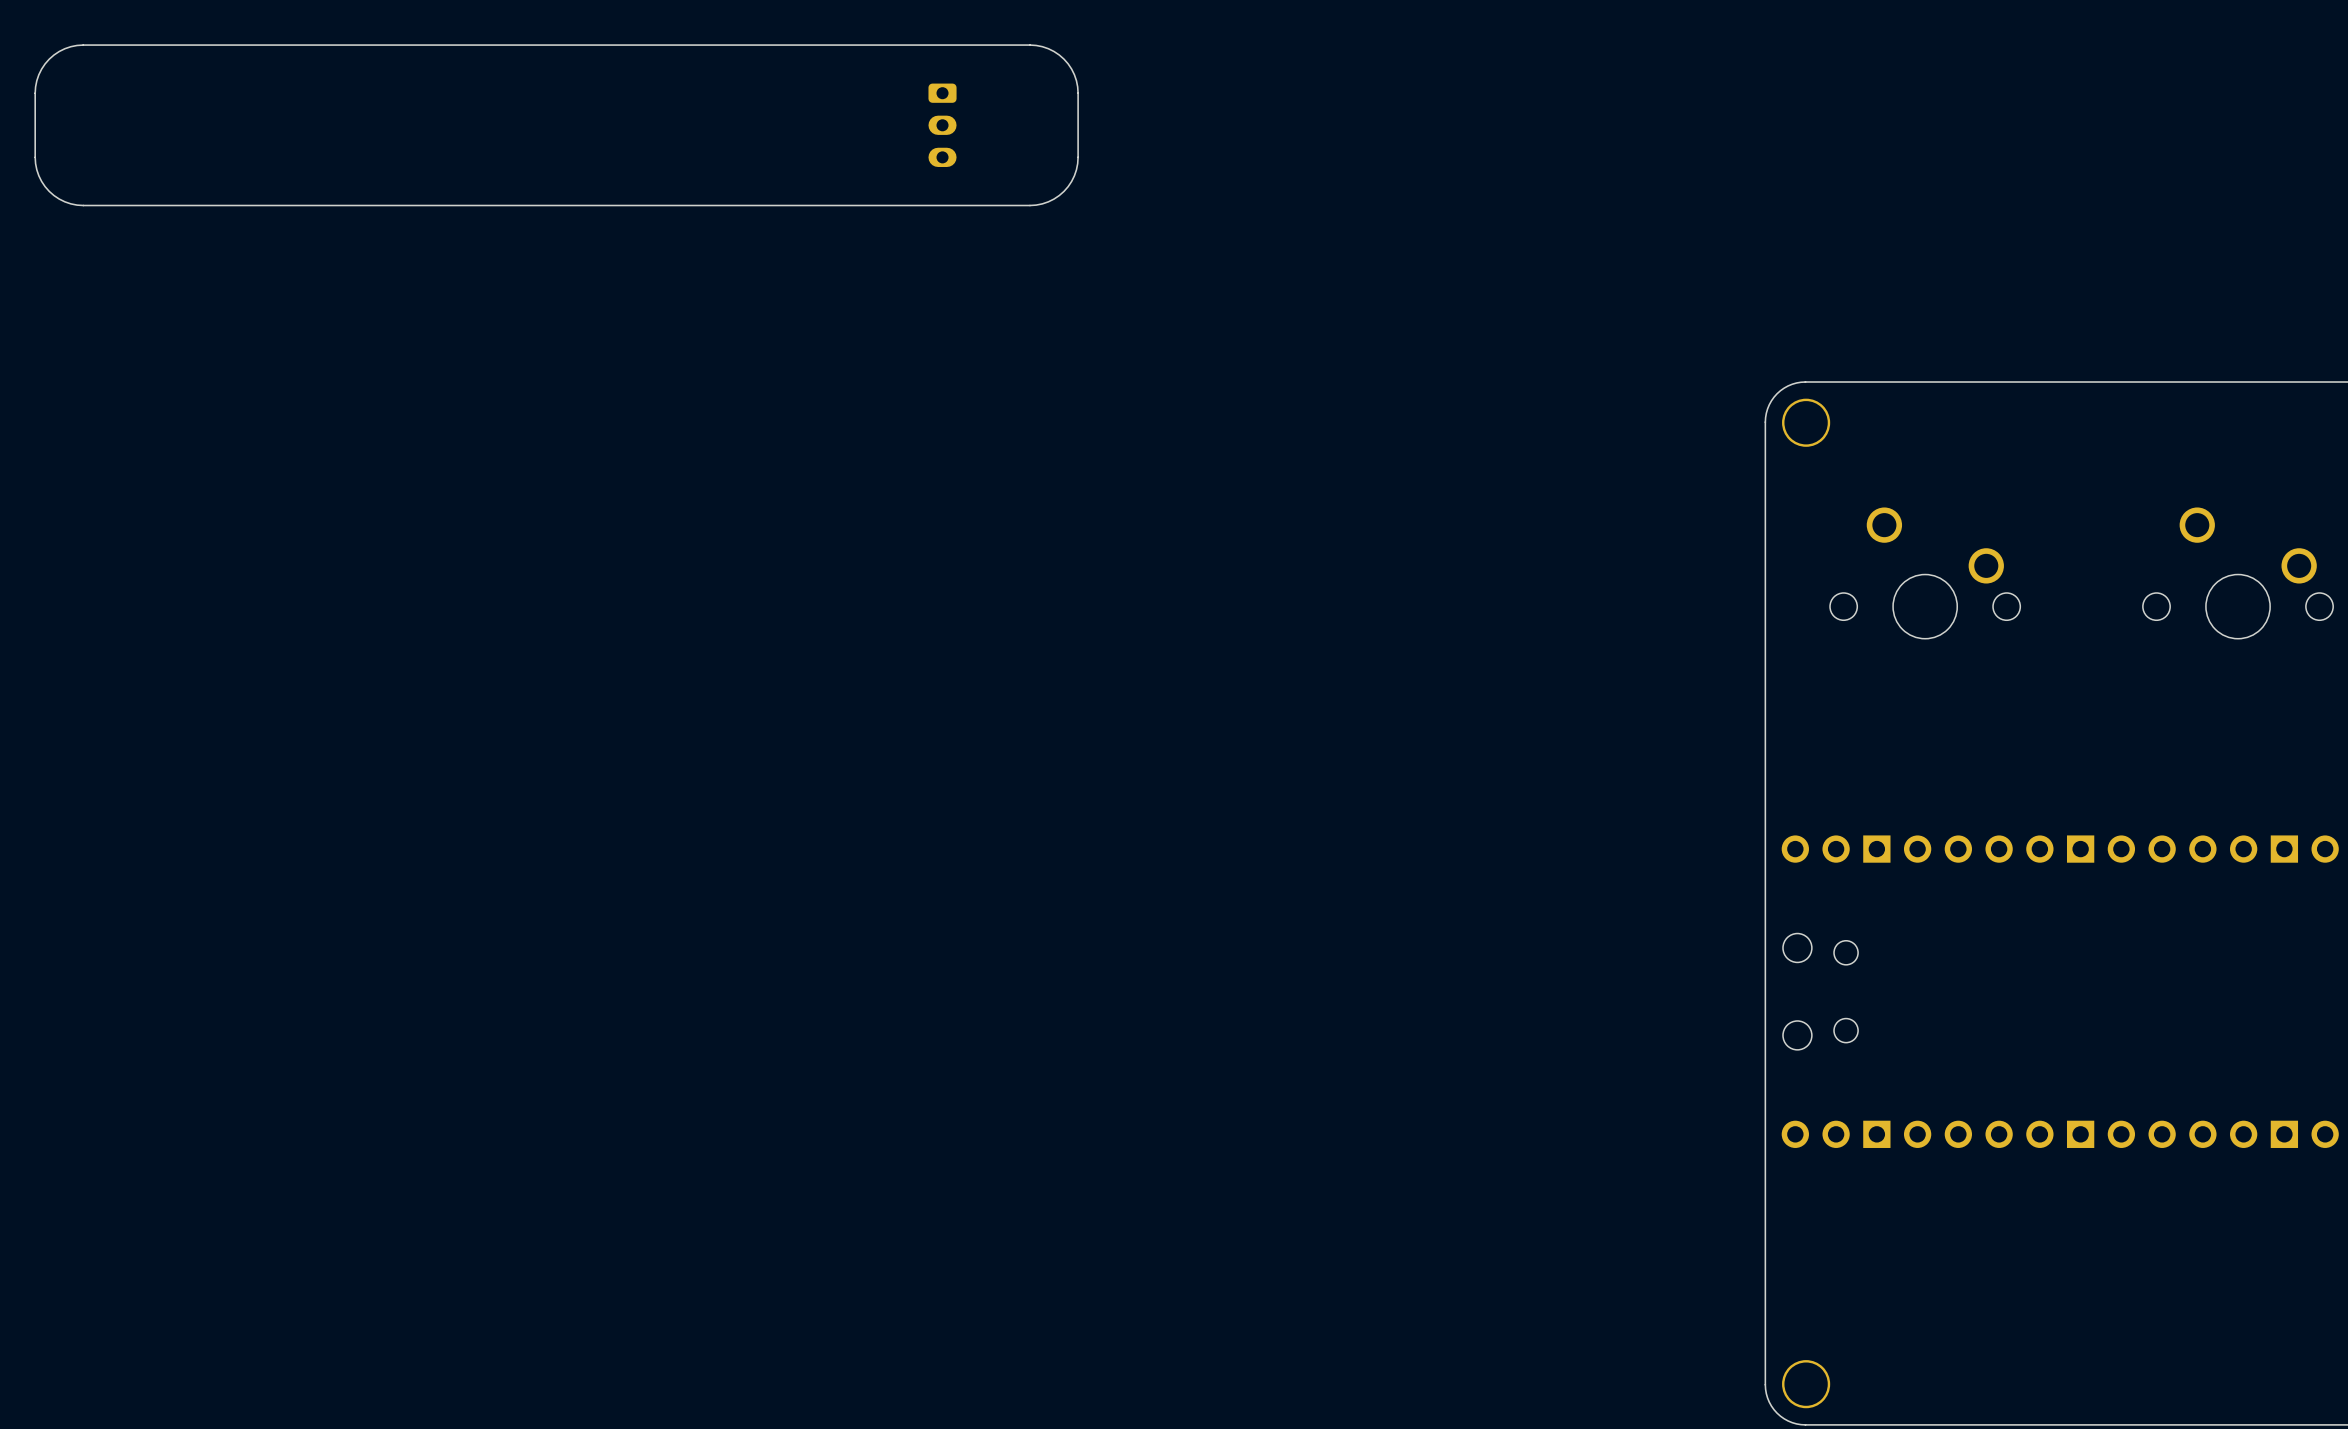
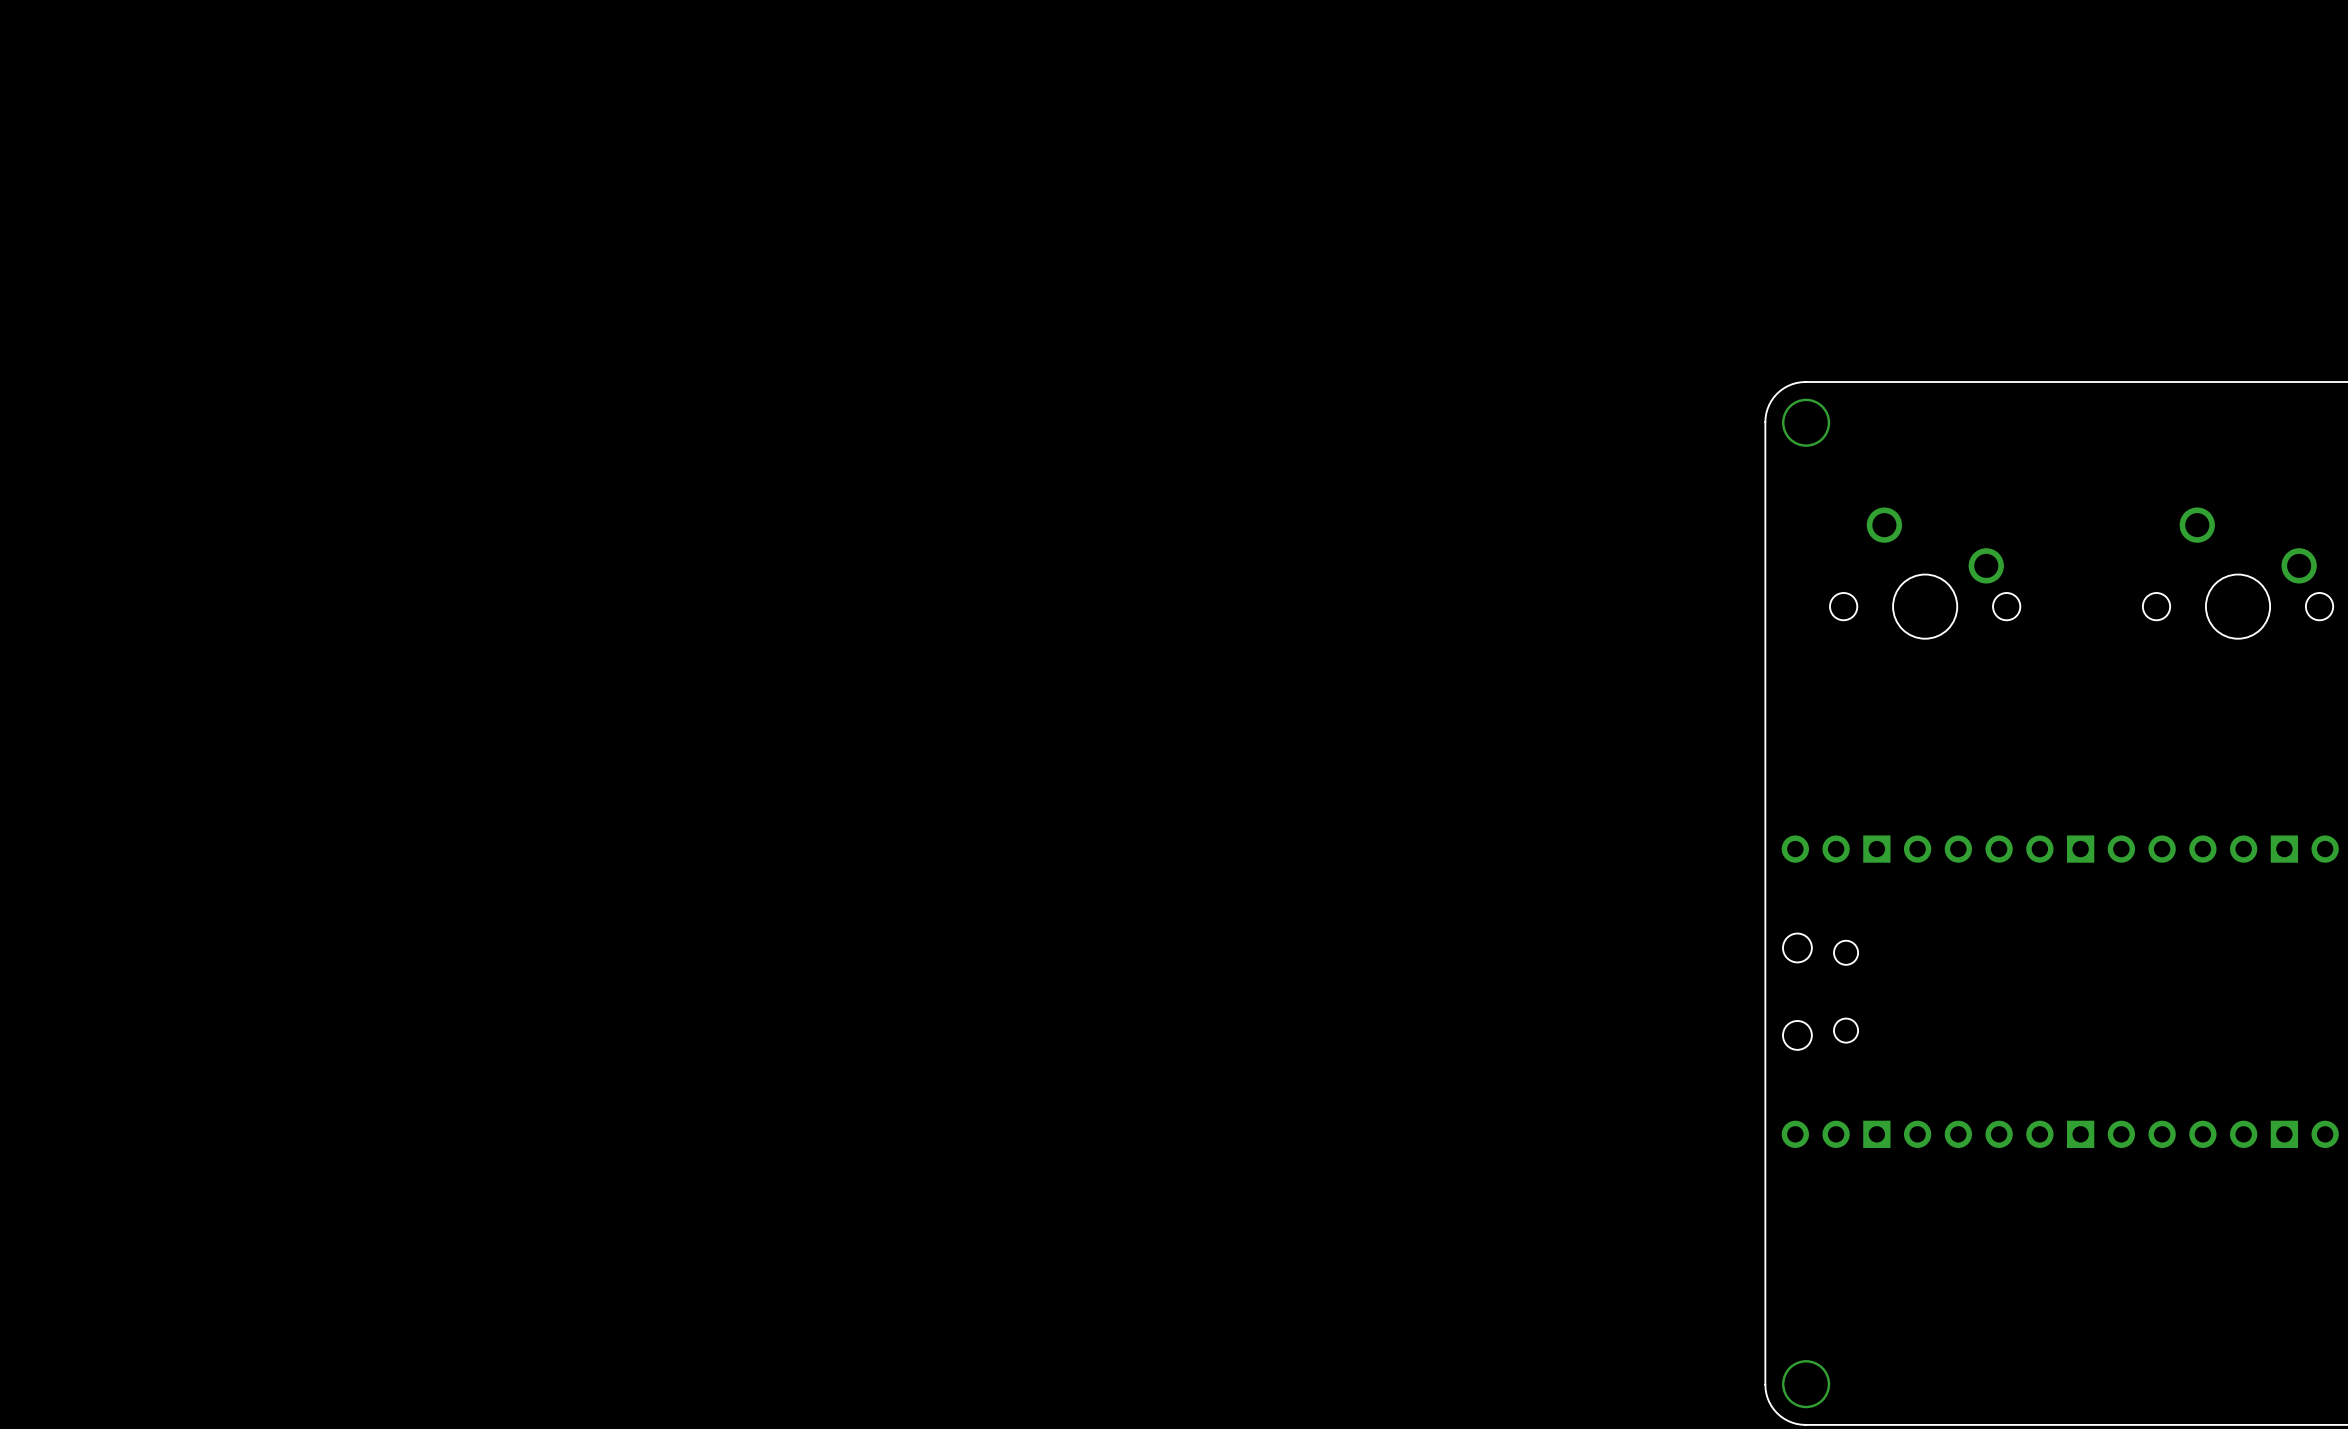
board edge: (1029, 45) (77, 45) (64, 48) (54, 55) (45, 63) (38, 74) (35, 93) (35, 163) (38, 175) (49, 191) (64, 201) (83, 205) (1036, 205) (1048, 201) (1059, 195) (1068, 186) (1074, 175) (1078, 157) (1078, 93) (1074, 74) (1064, 59) (1048, 48) (1029, 45) -> none
part: (942, 125) -> none

